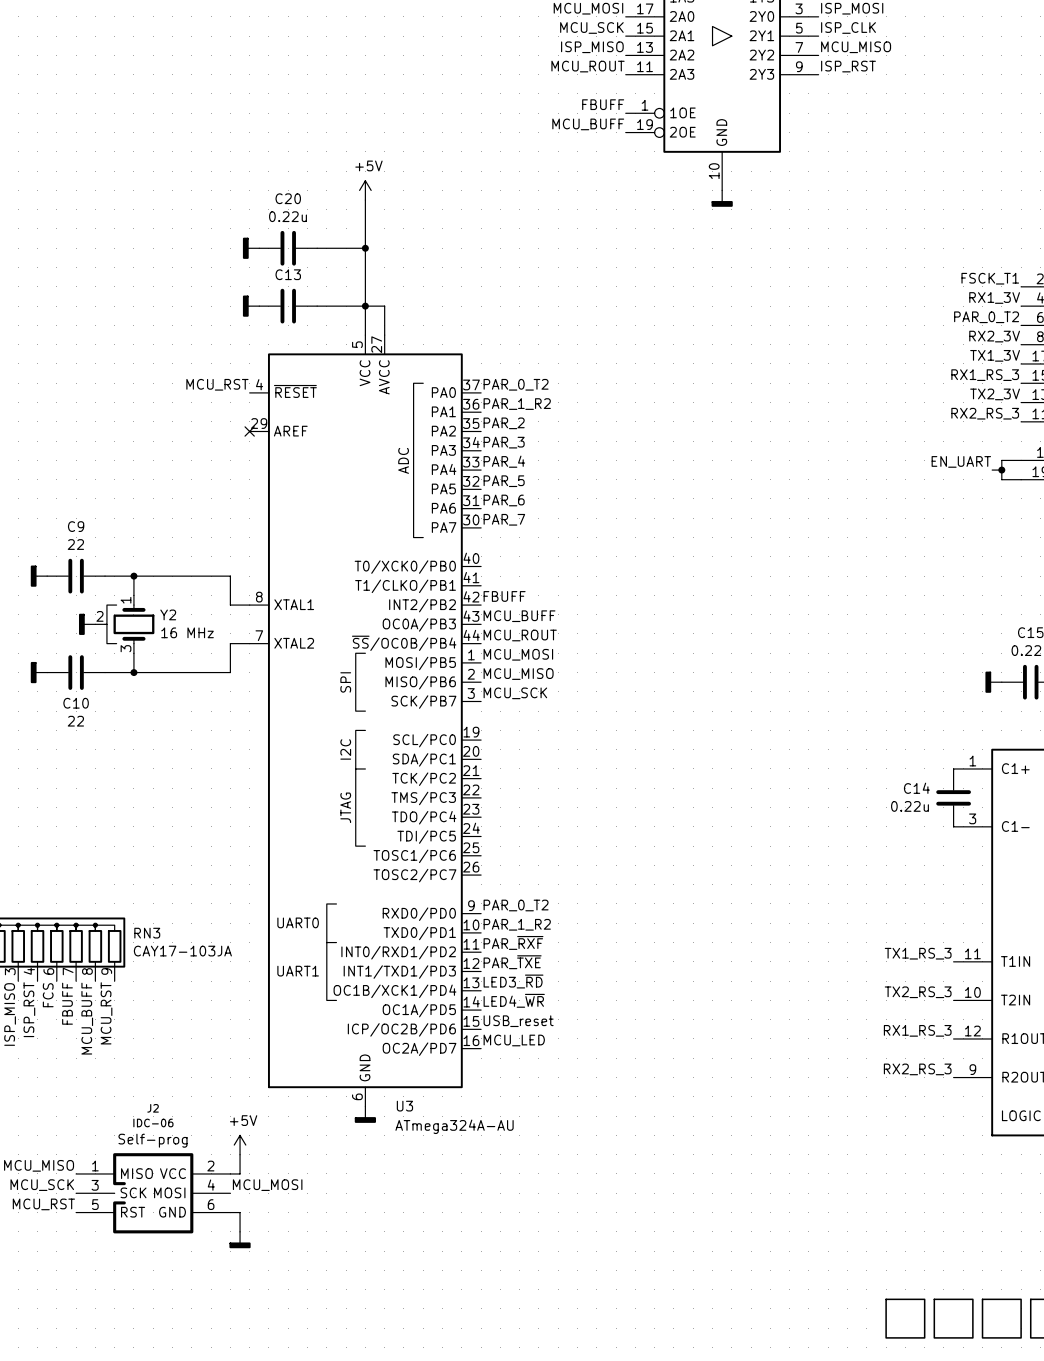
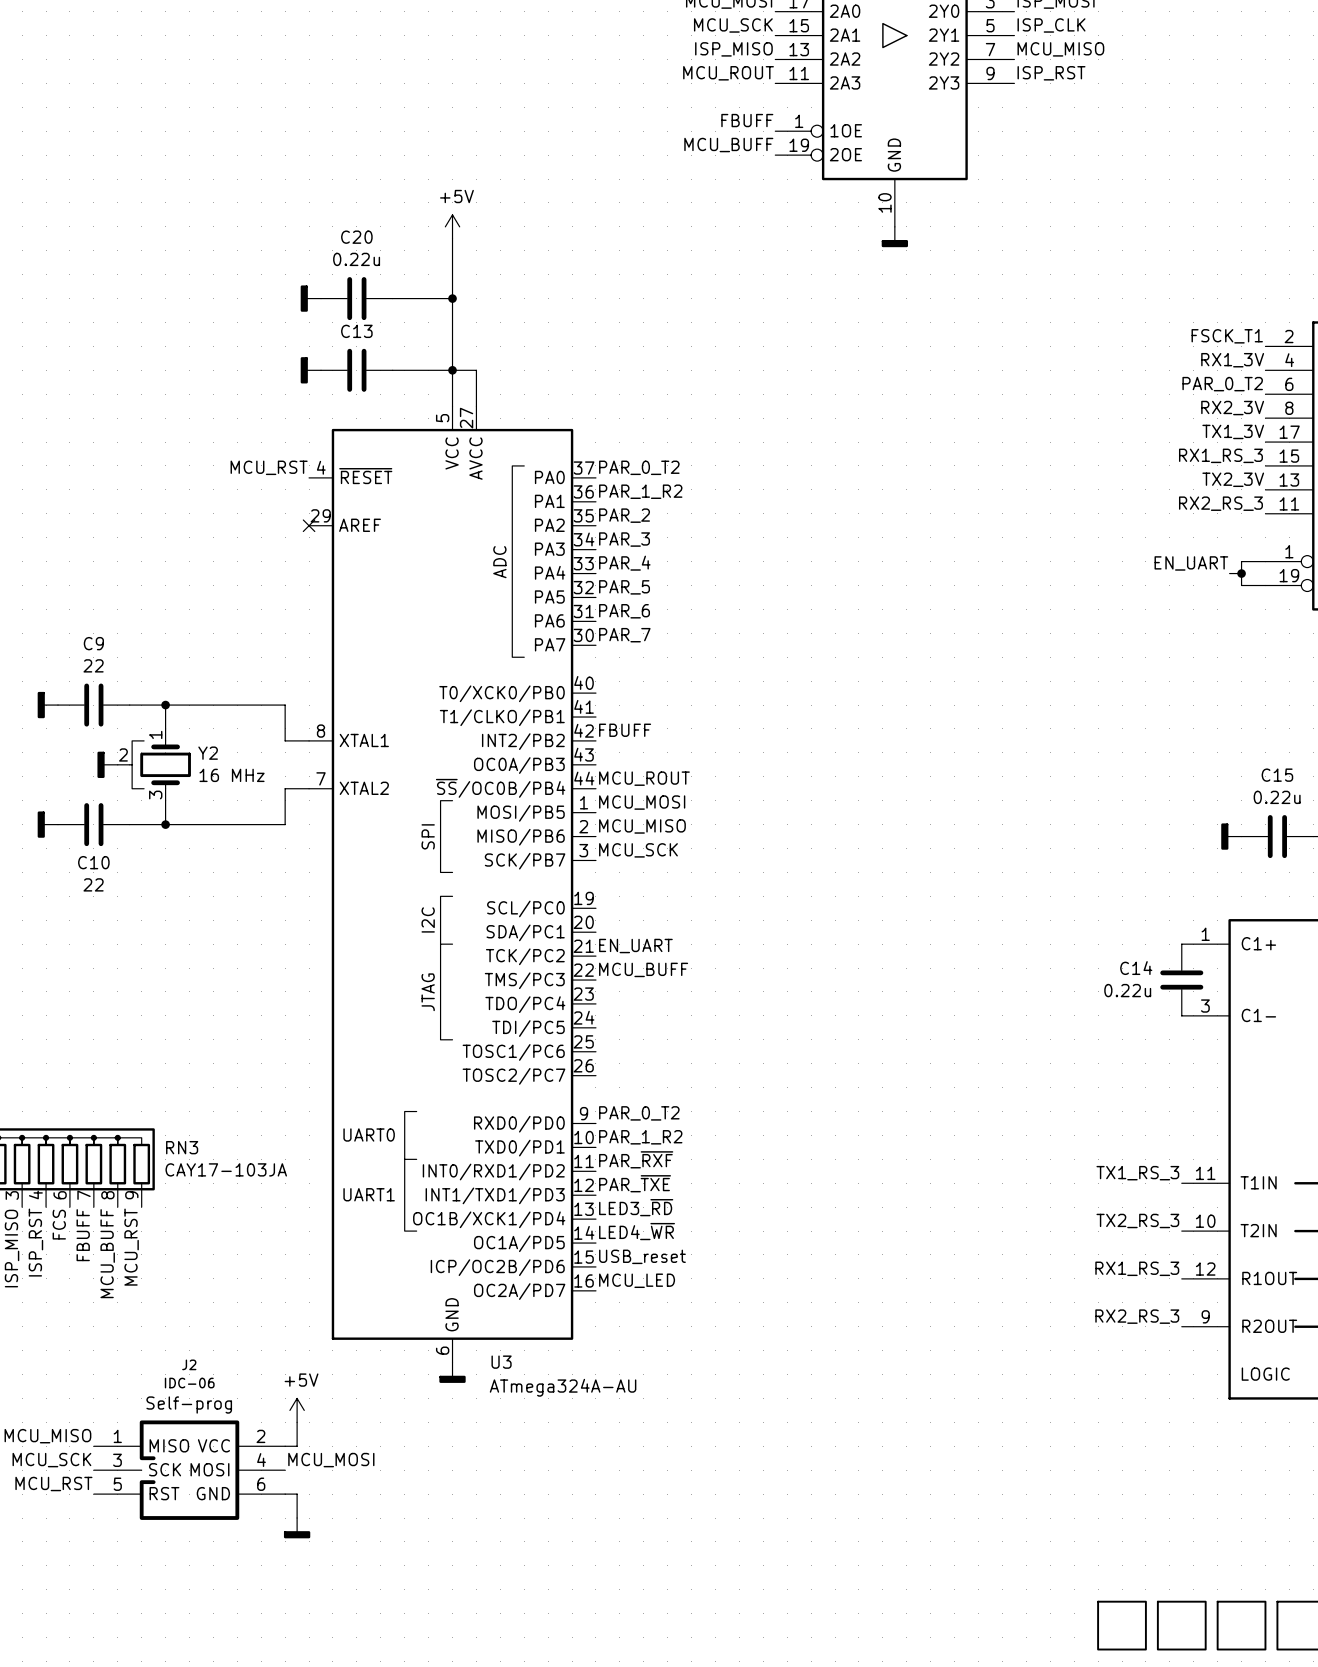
label position: MCU_BUFF (519, 616) -> MCU_BUFF (643, 969)
label: none -> EN_UART (635, 946)

